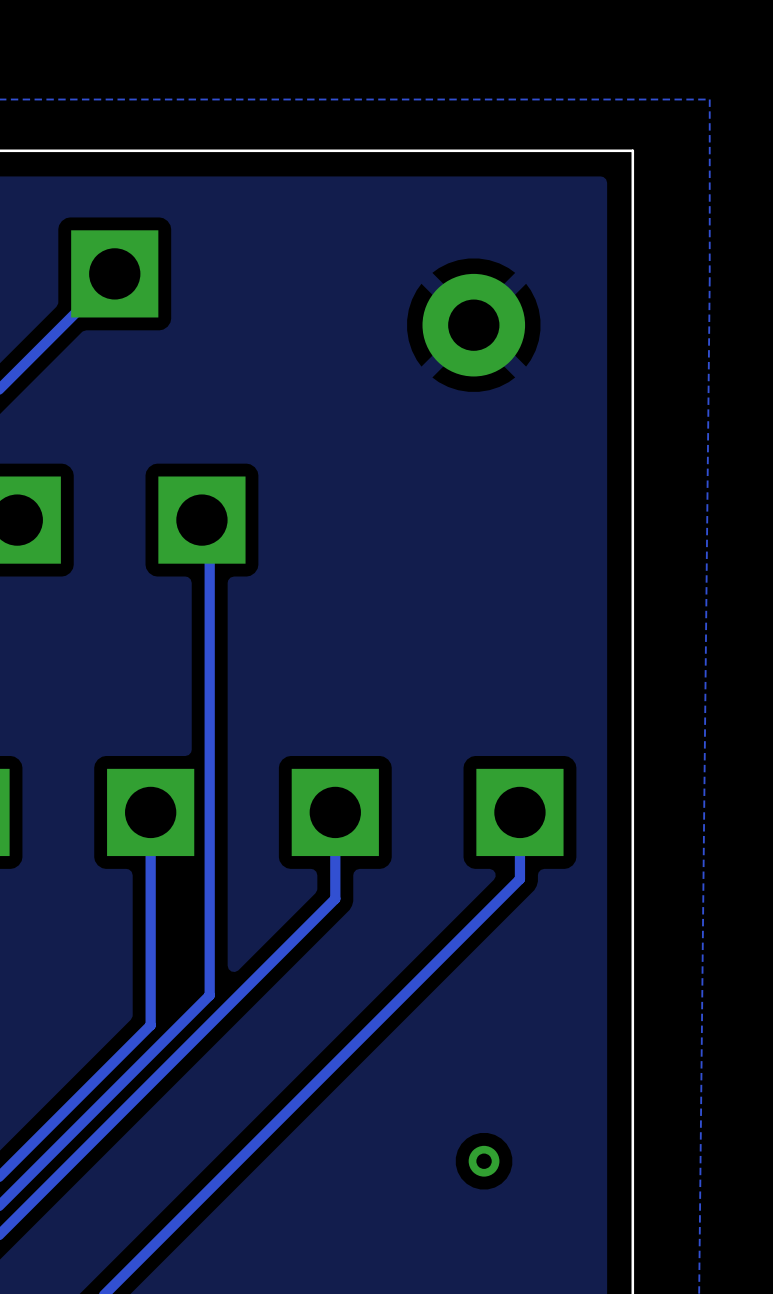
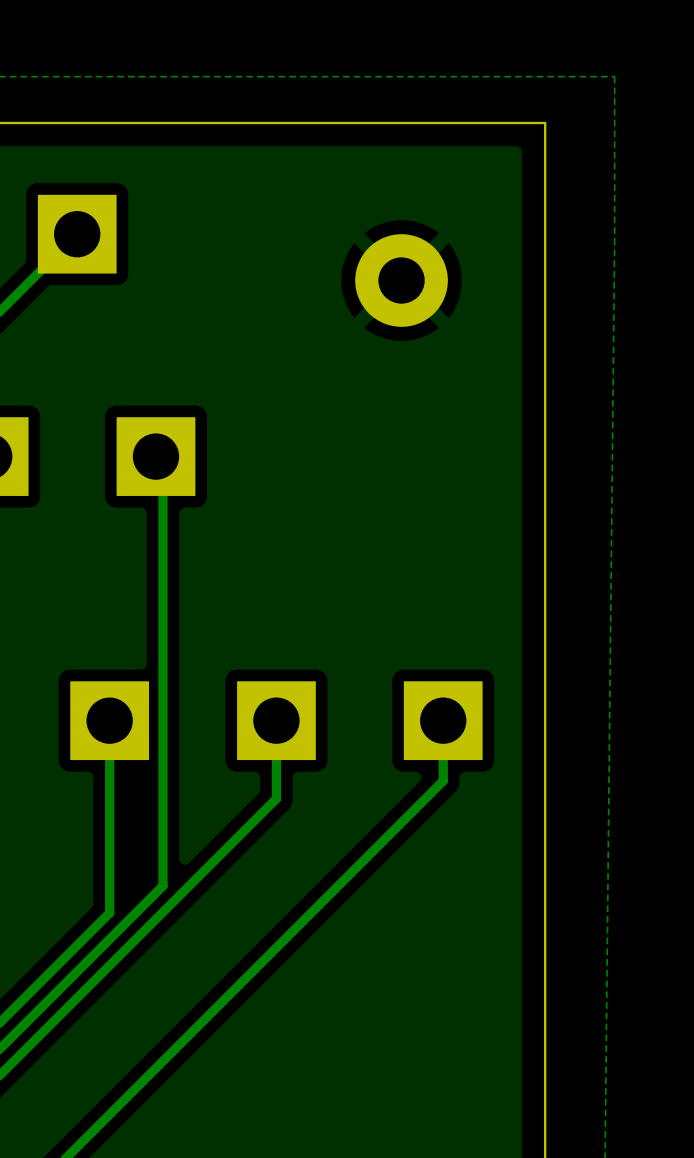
via: (484, 1161) -> none

